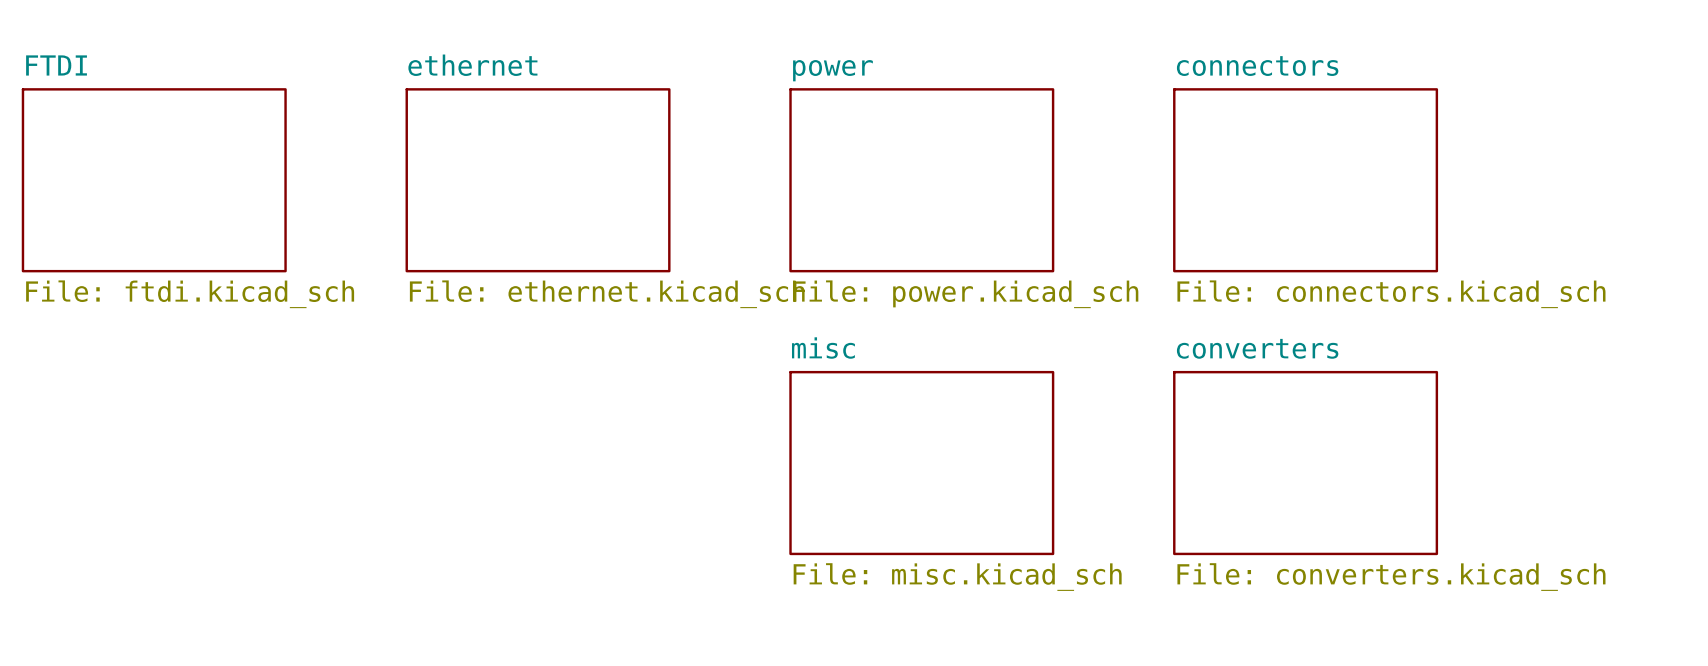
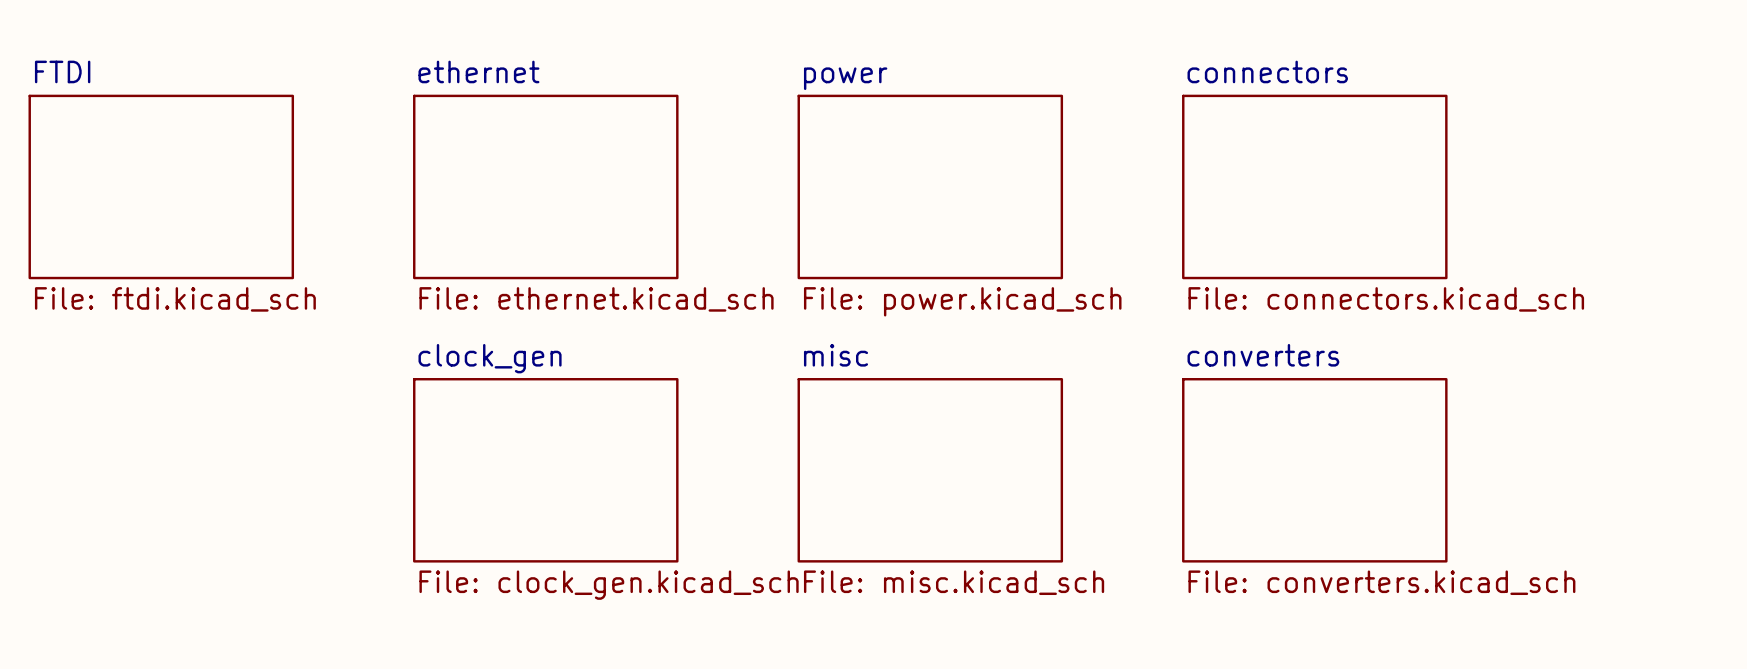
sheet clock_gen: none -> File: clock_gen.kicad_sch (545, 470)

